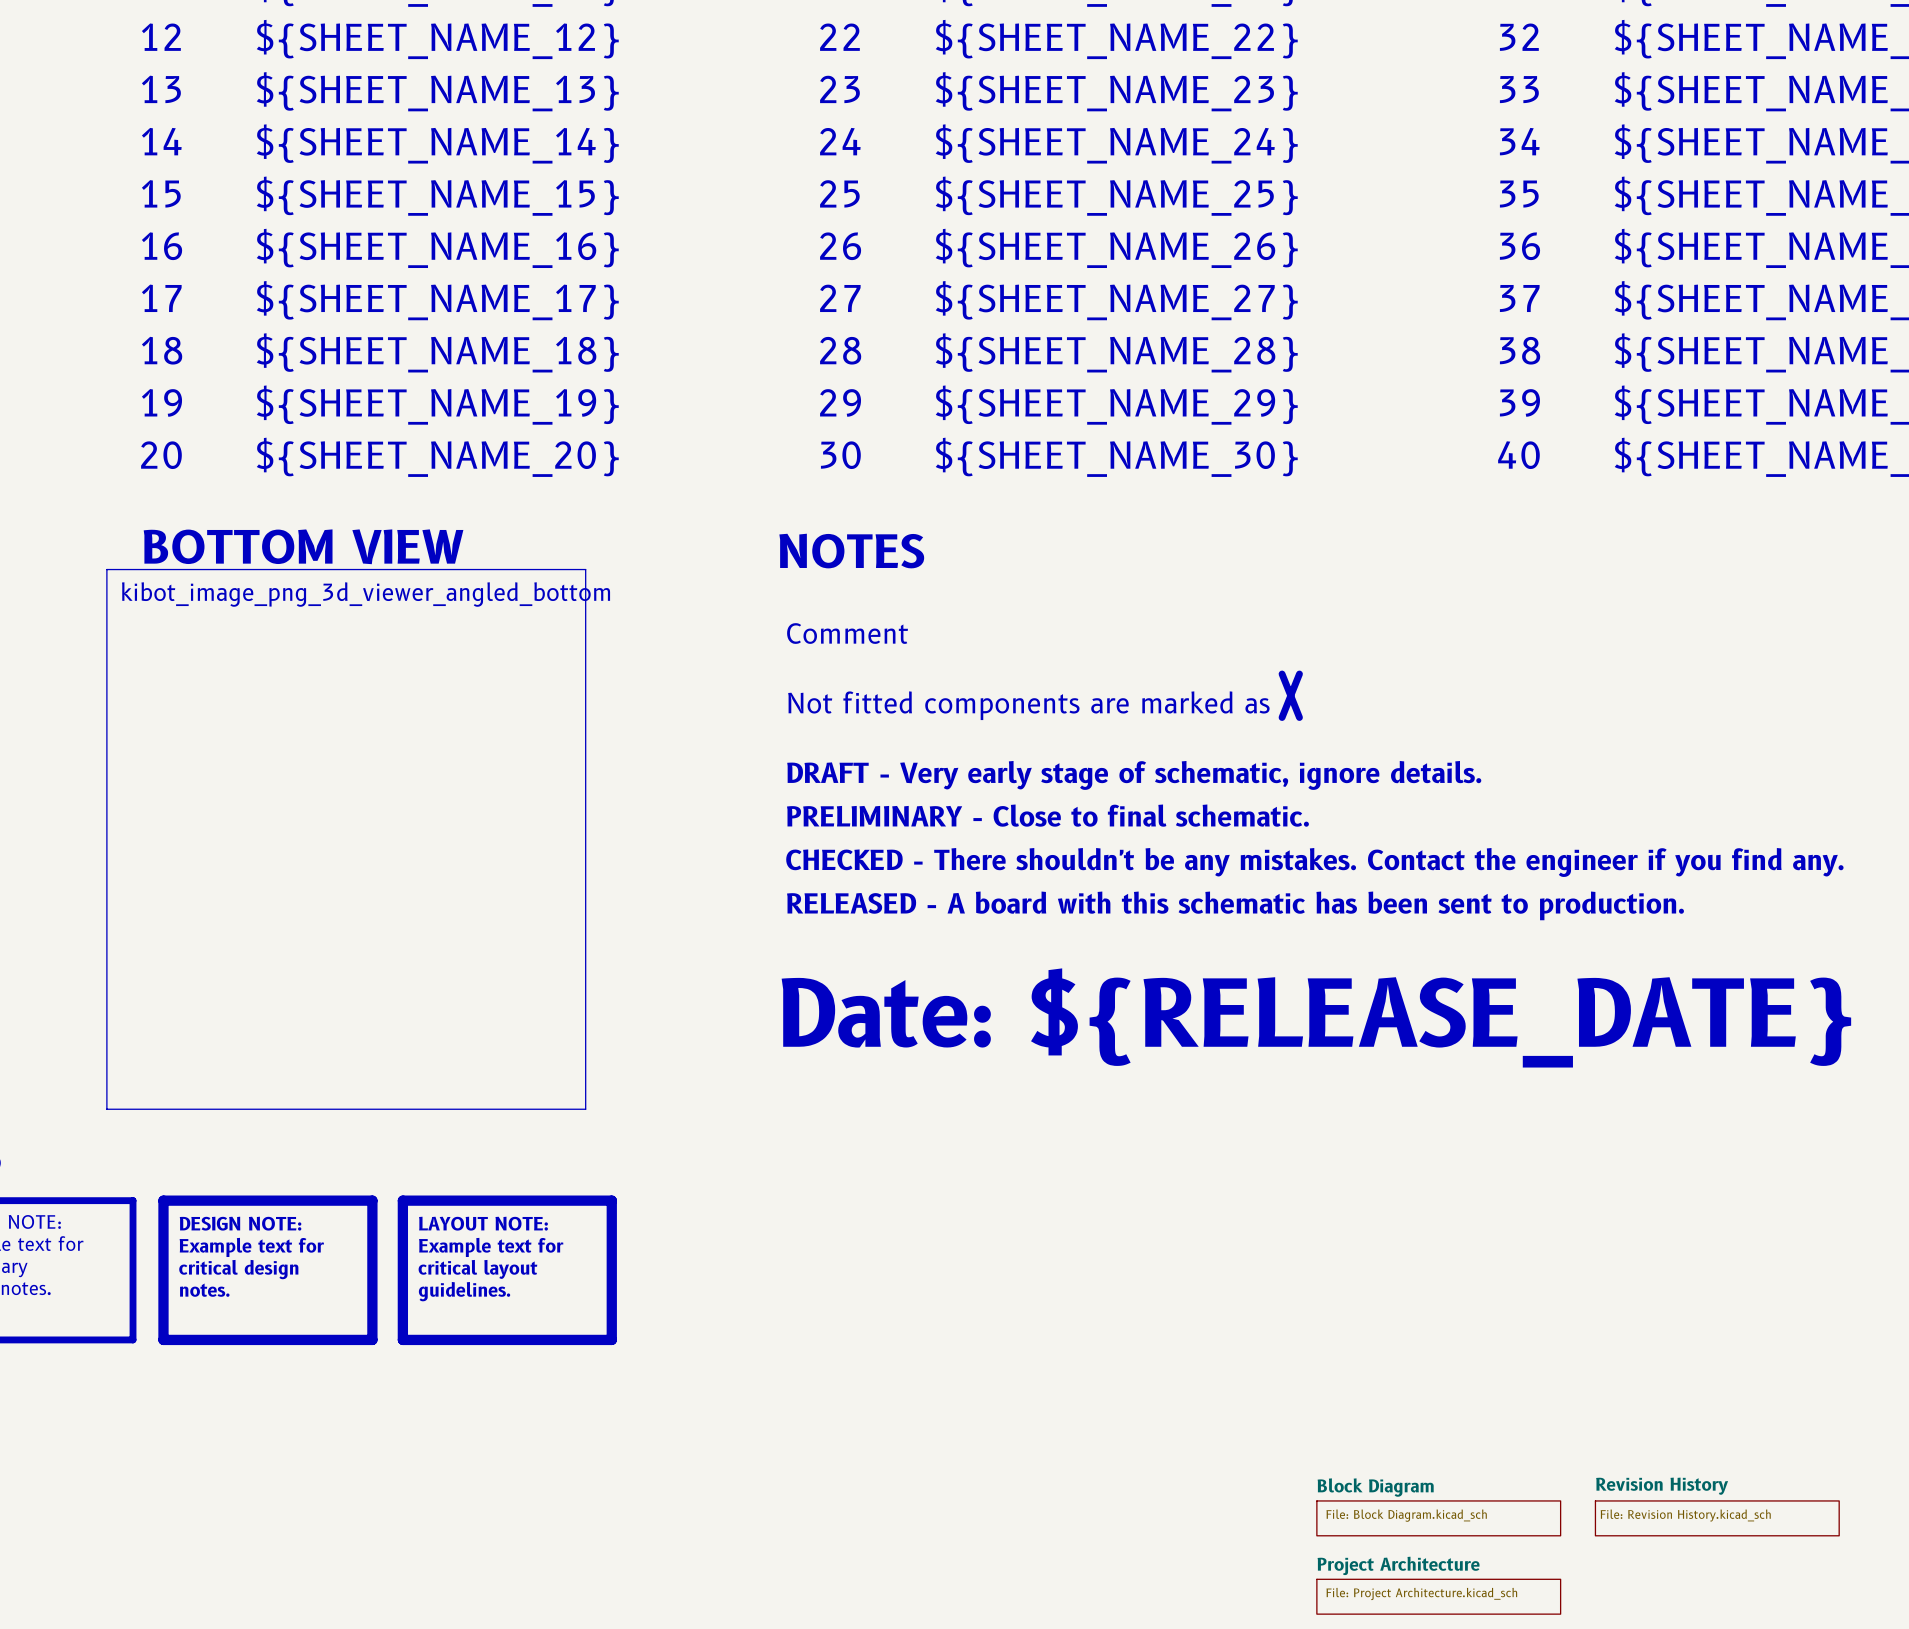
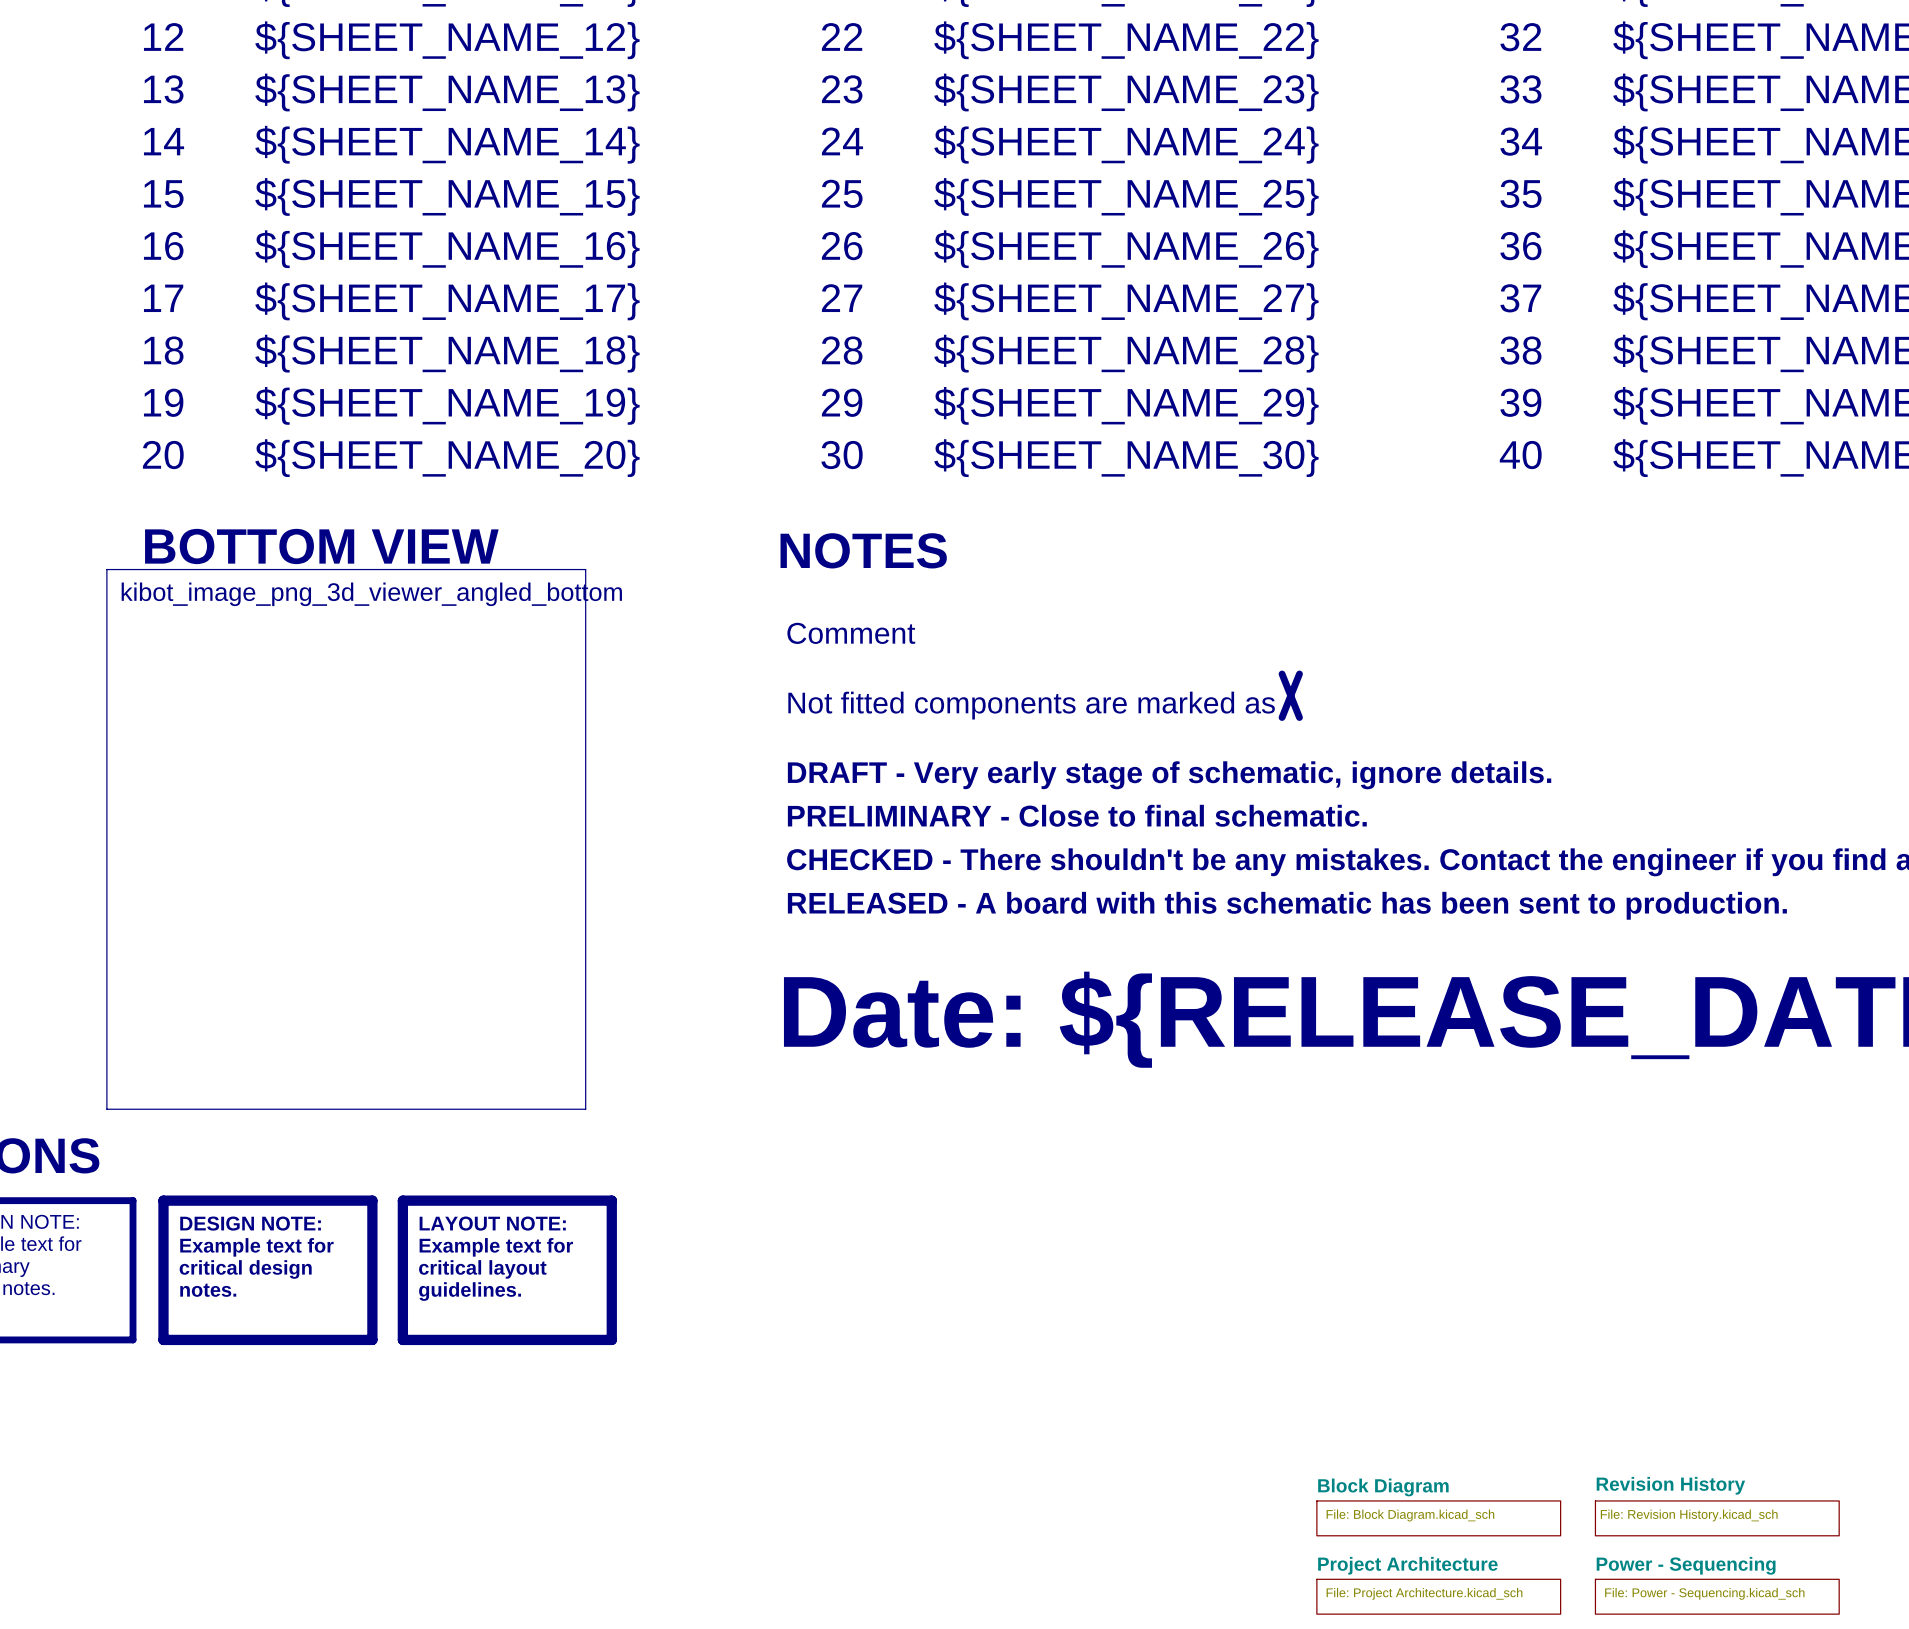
sheet Power - Sequencing: none -> File: Power - Sequencing.kicad_sch (1717, 1596)

